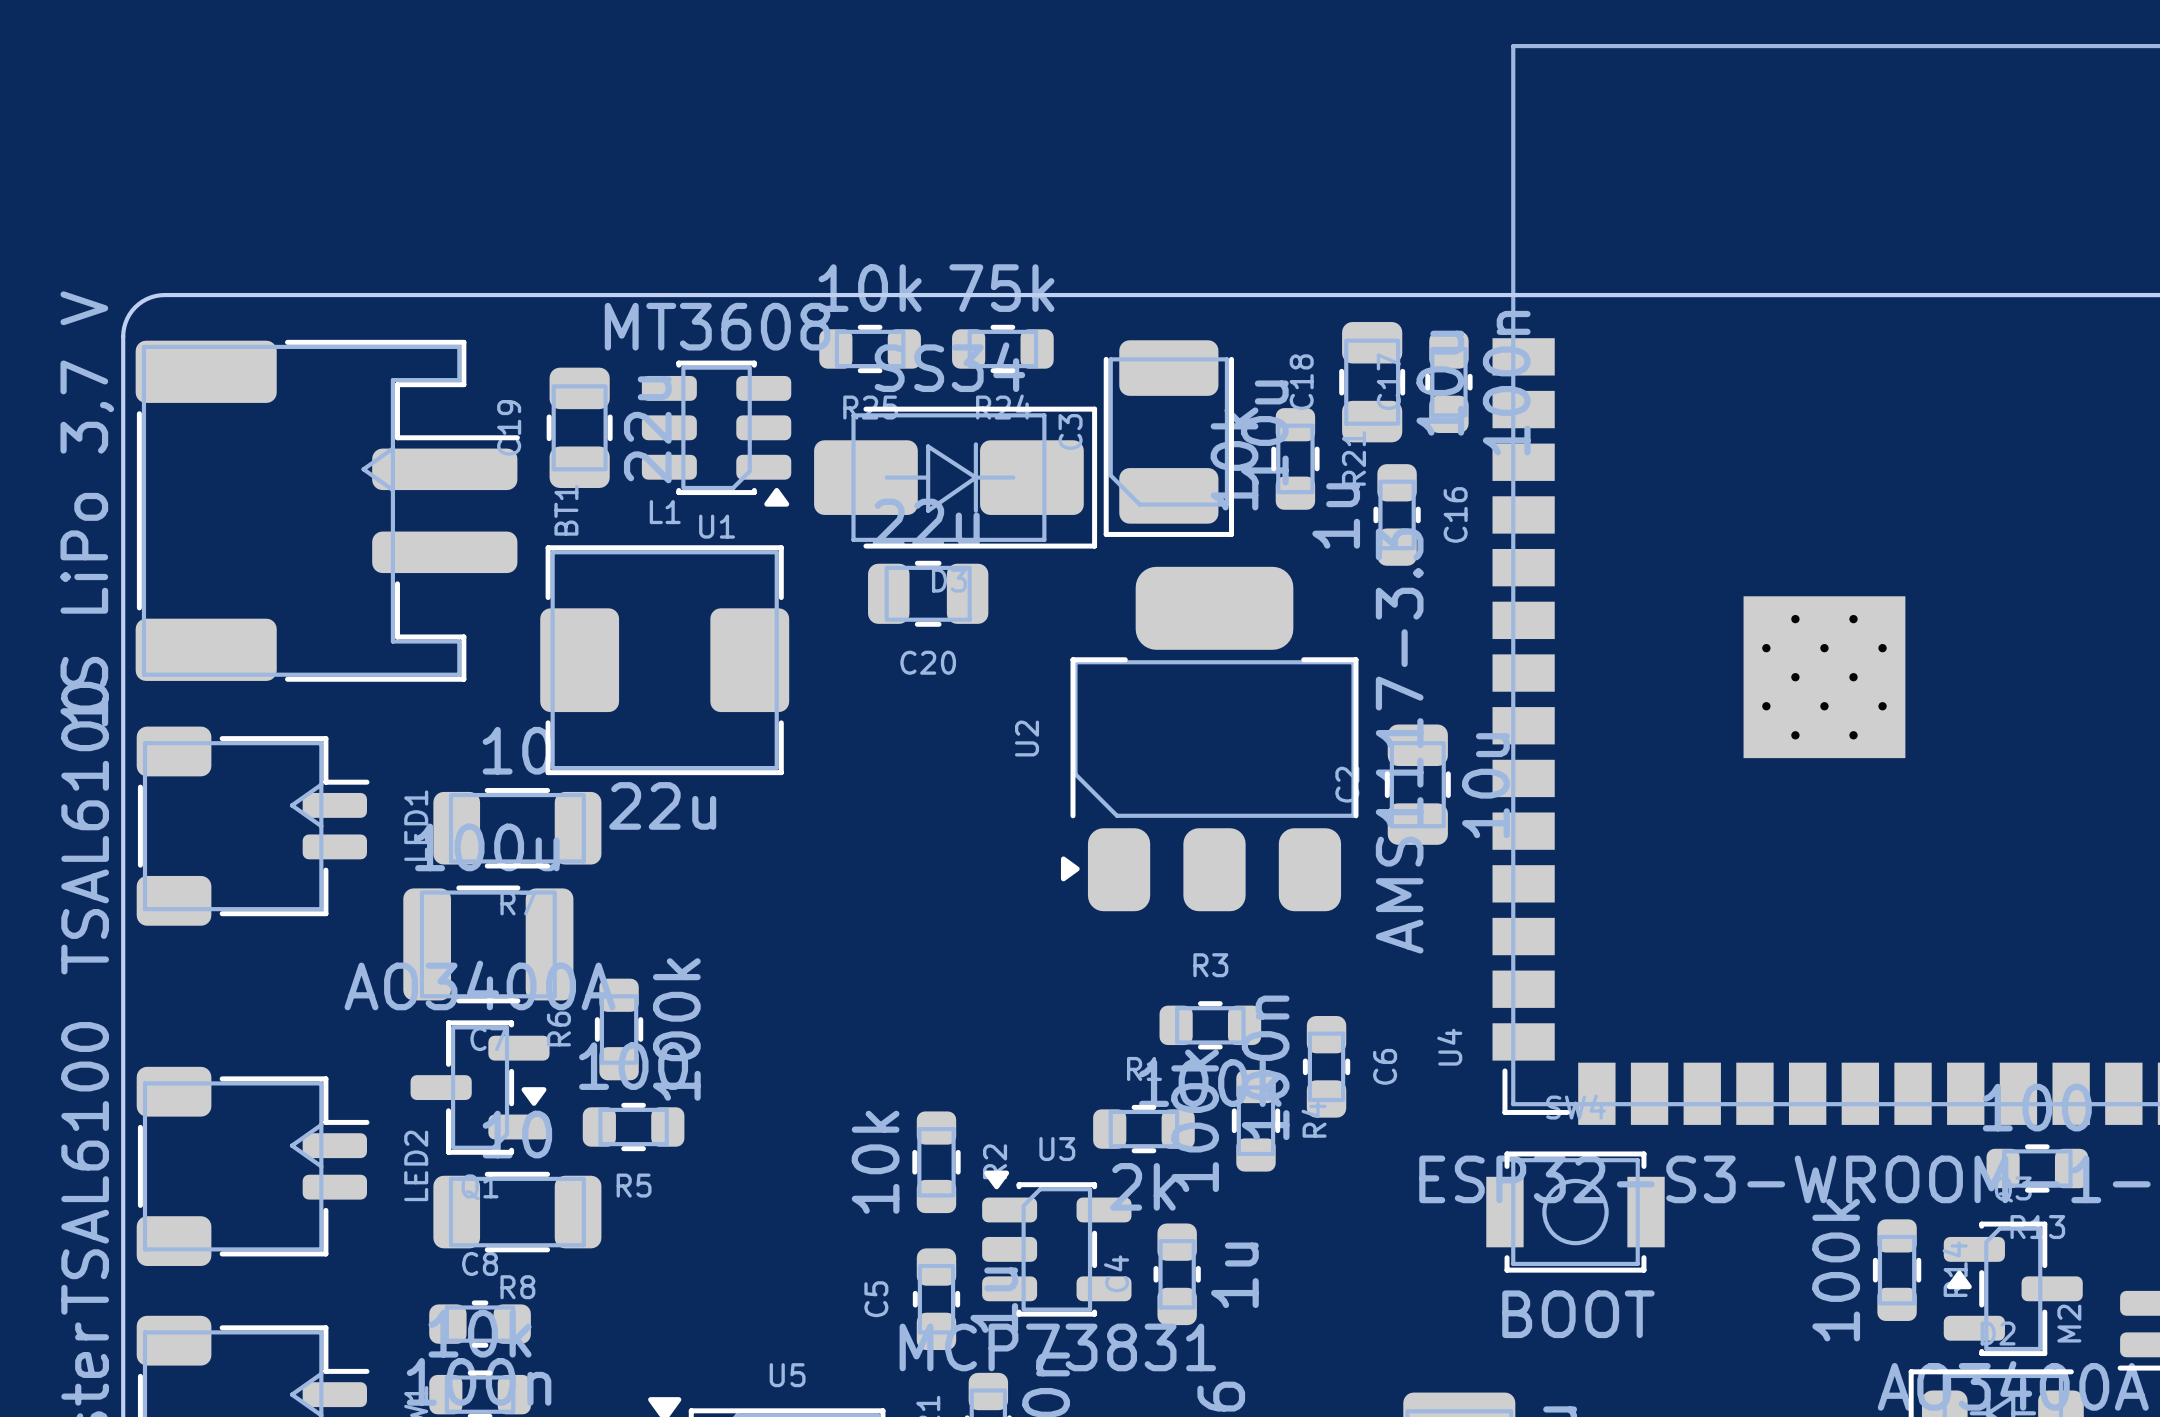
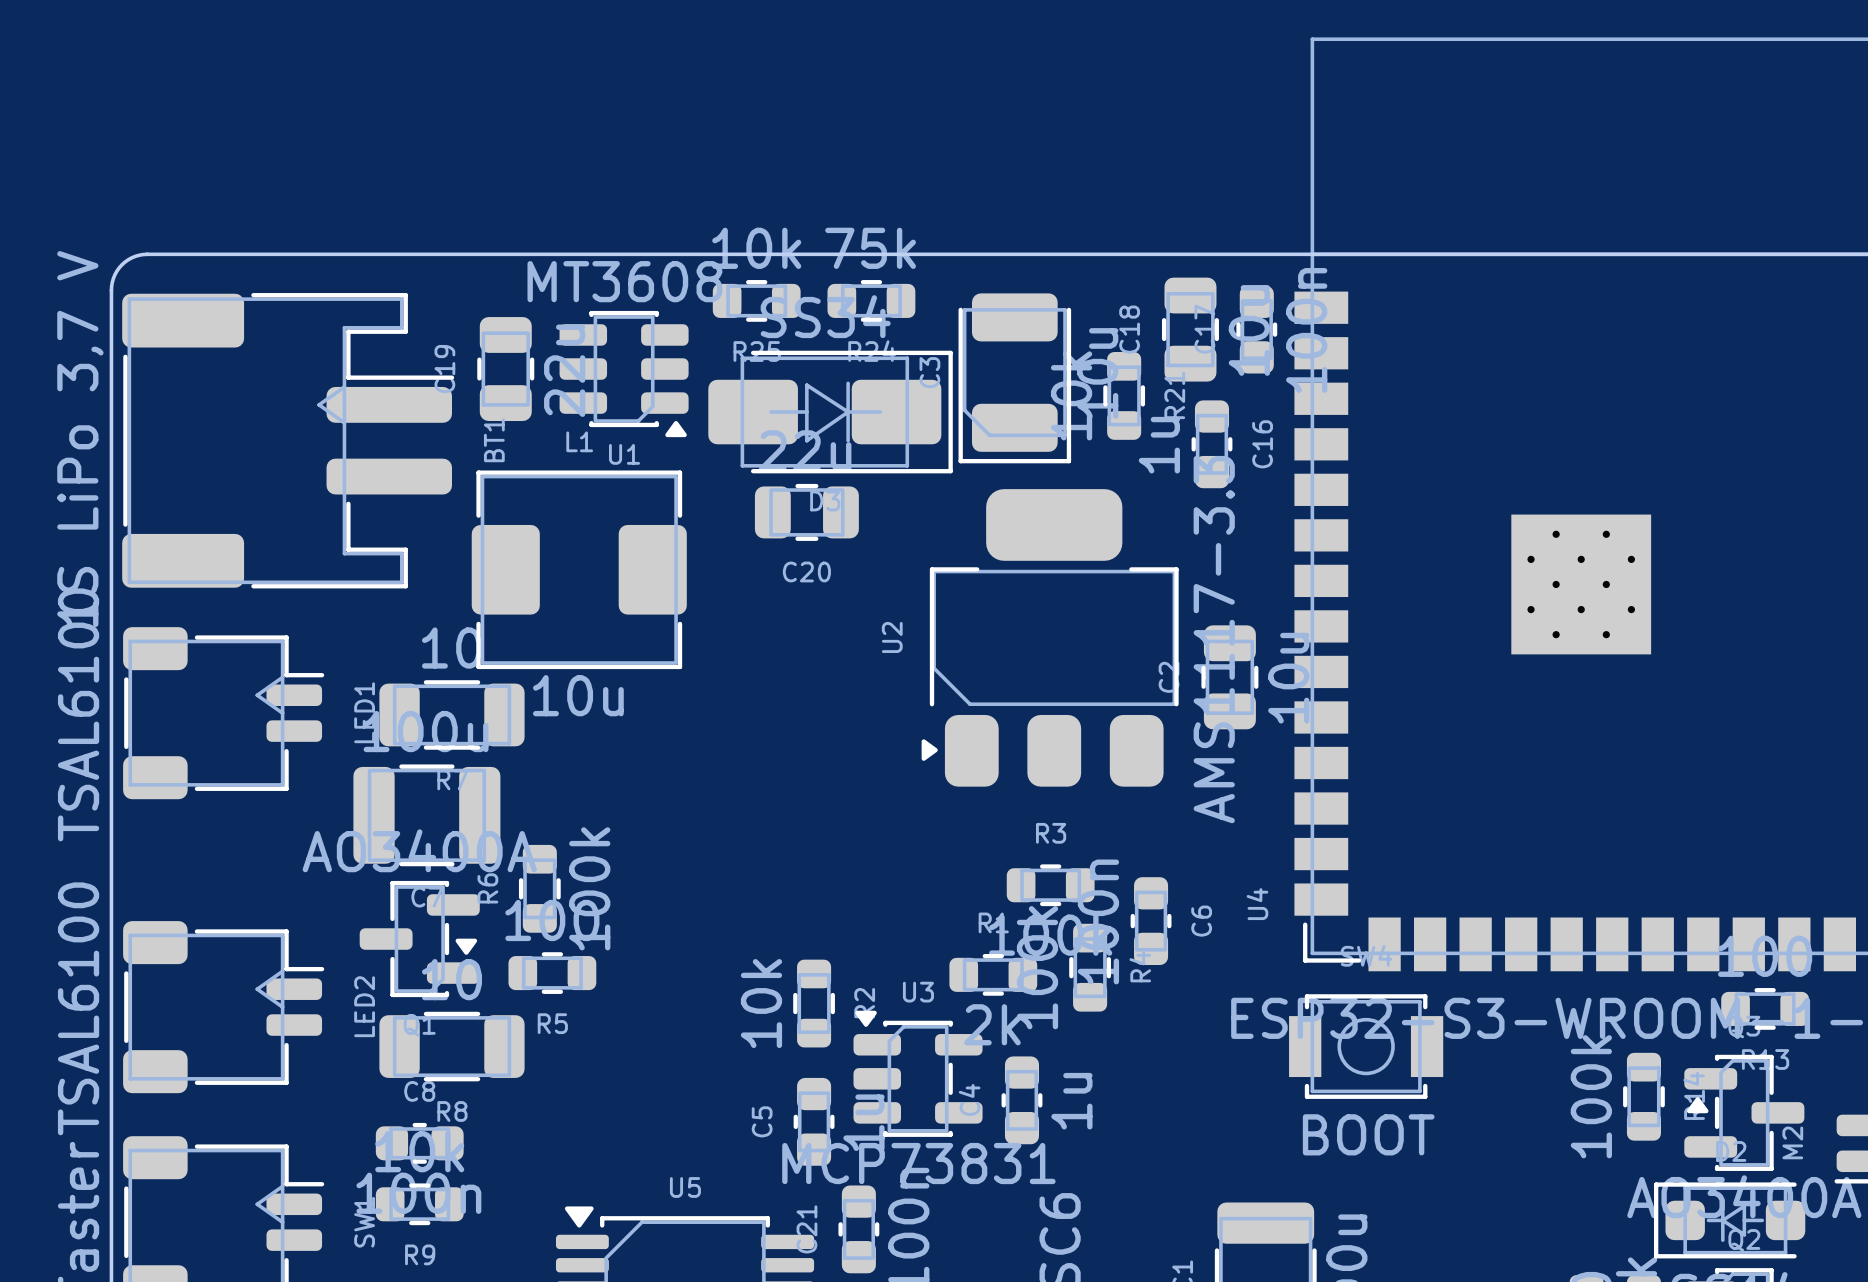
L1 value: 22u (662, 805) -> 10u (578, 695)

